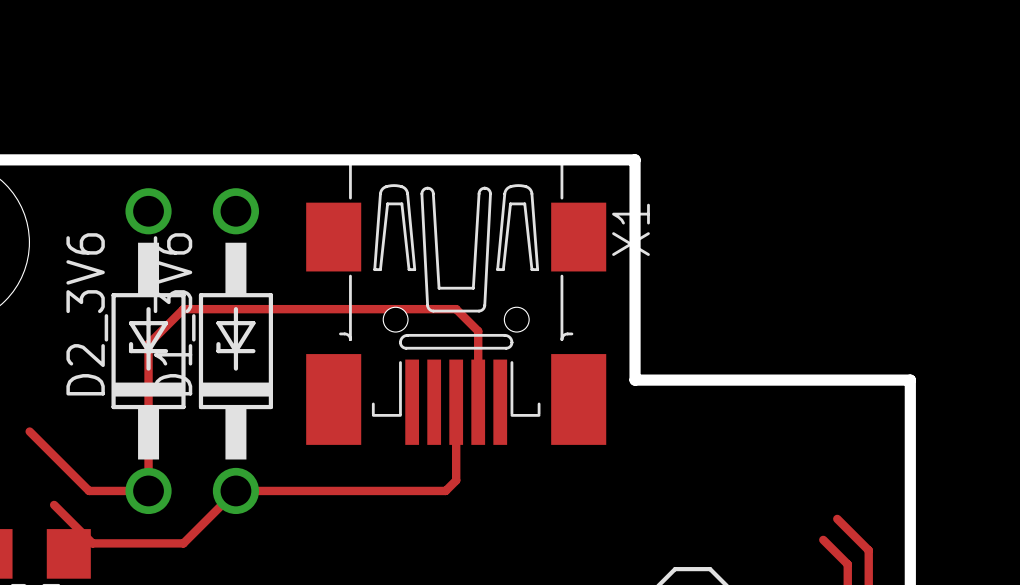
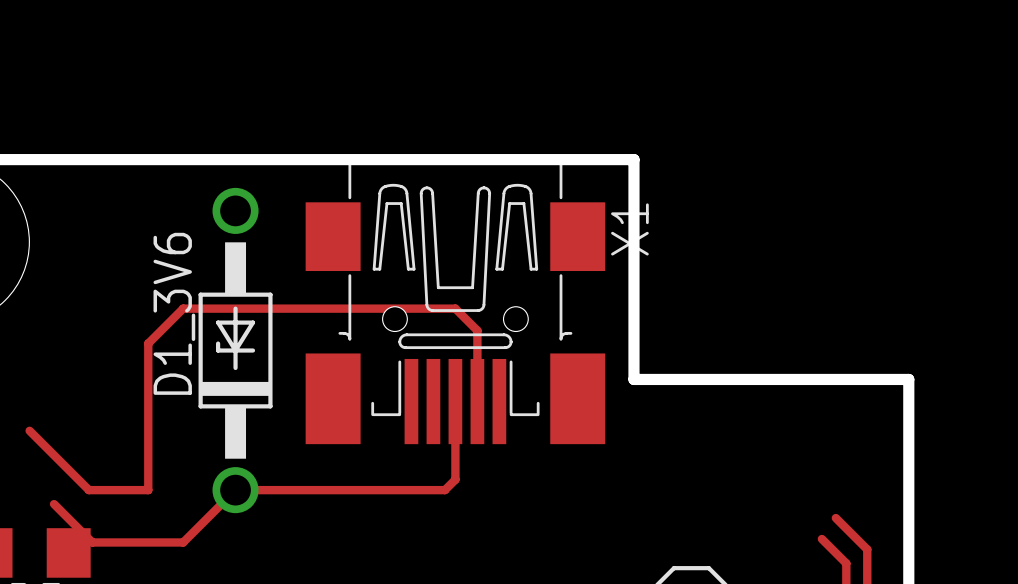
D2_3V6: (148, 351) -> none

